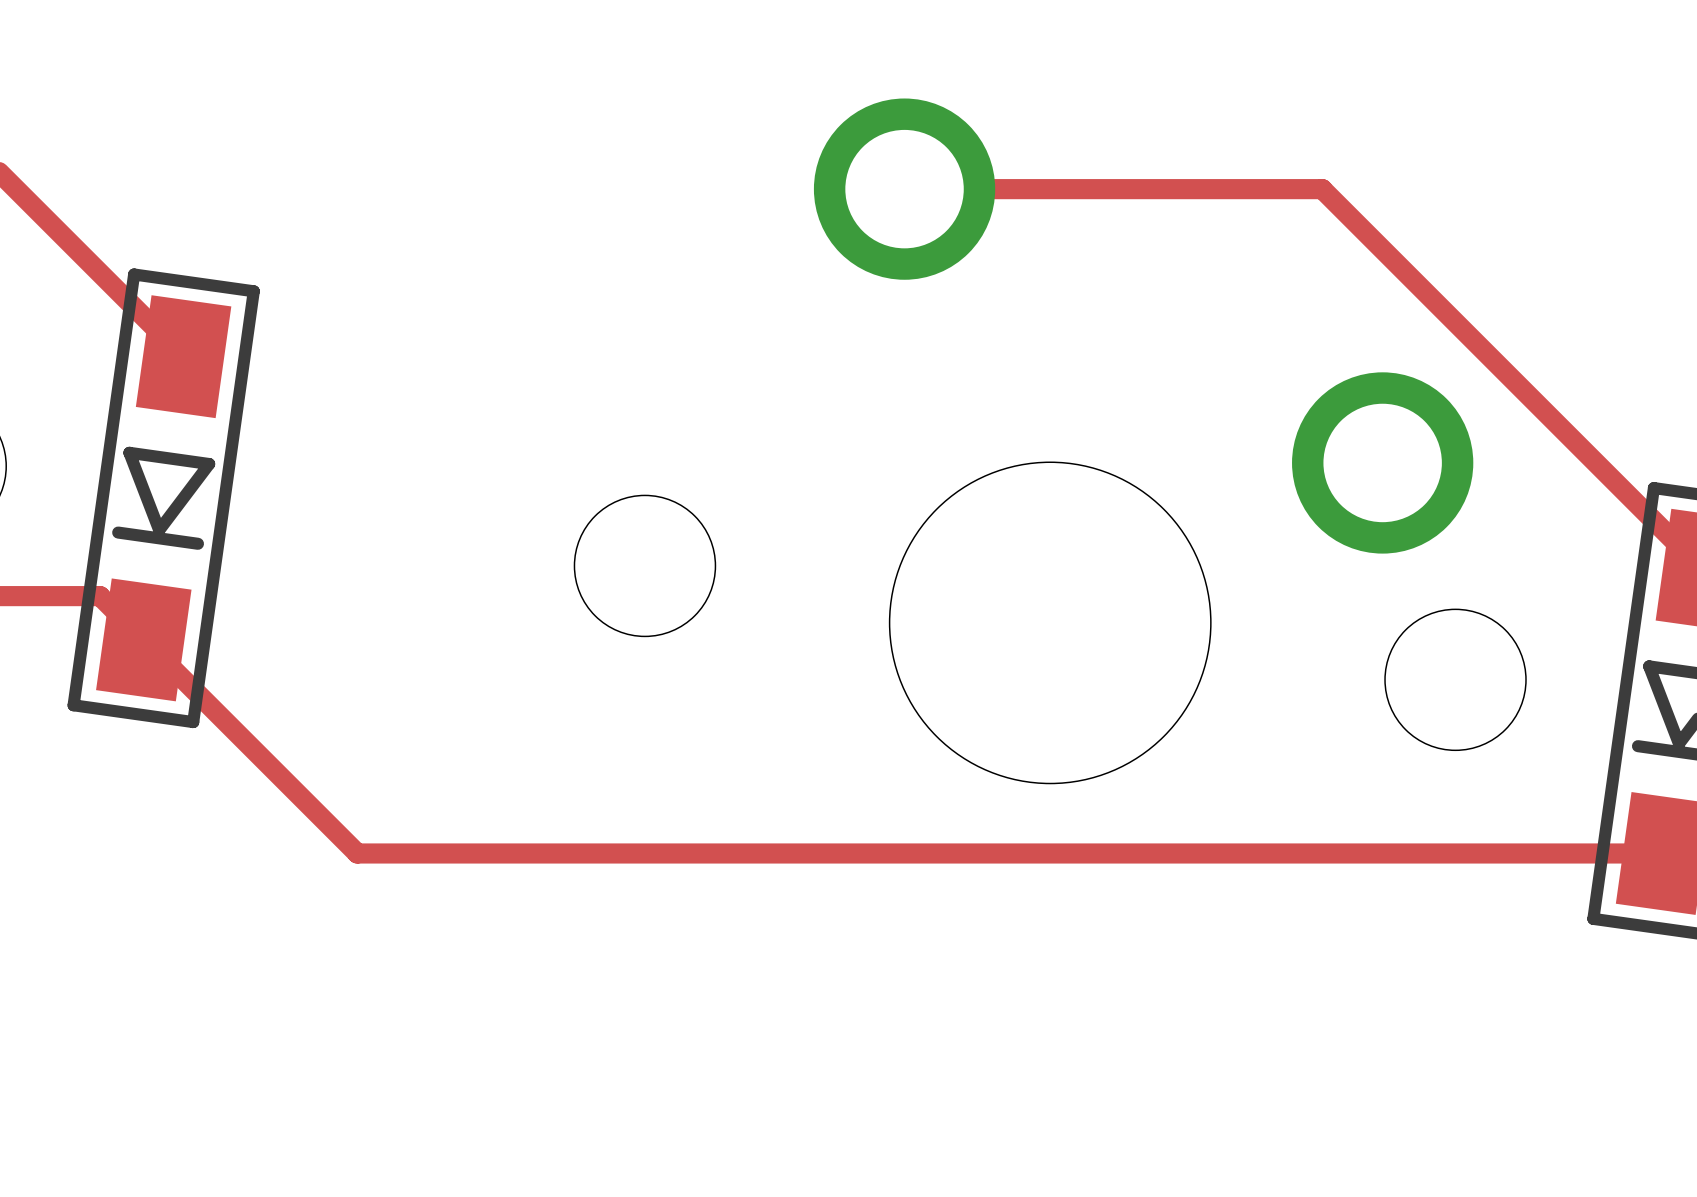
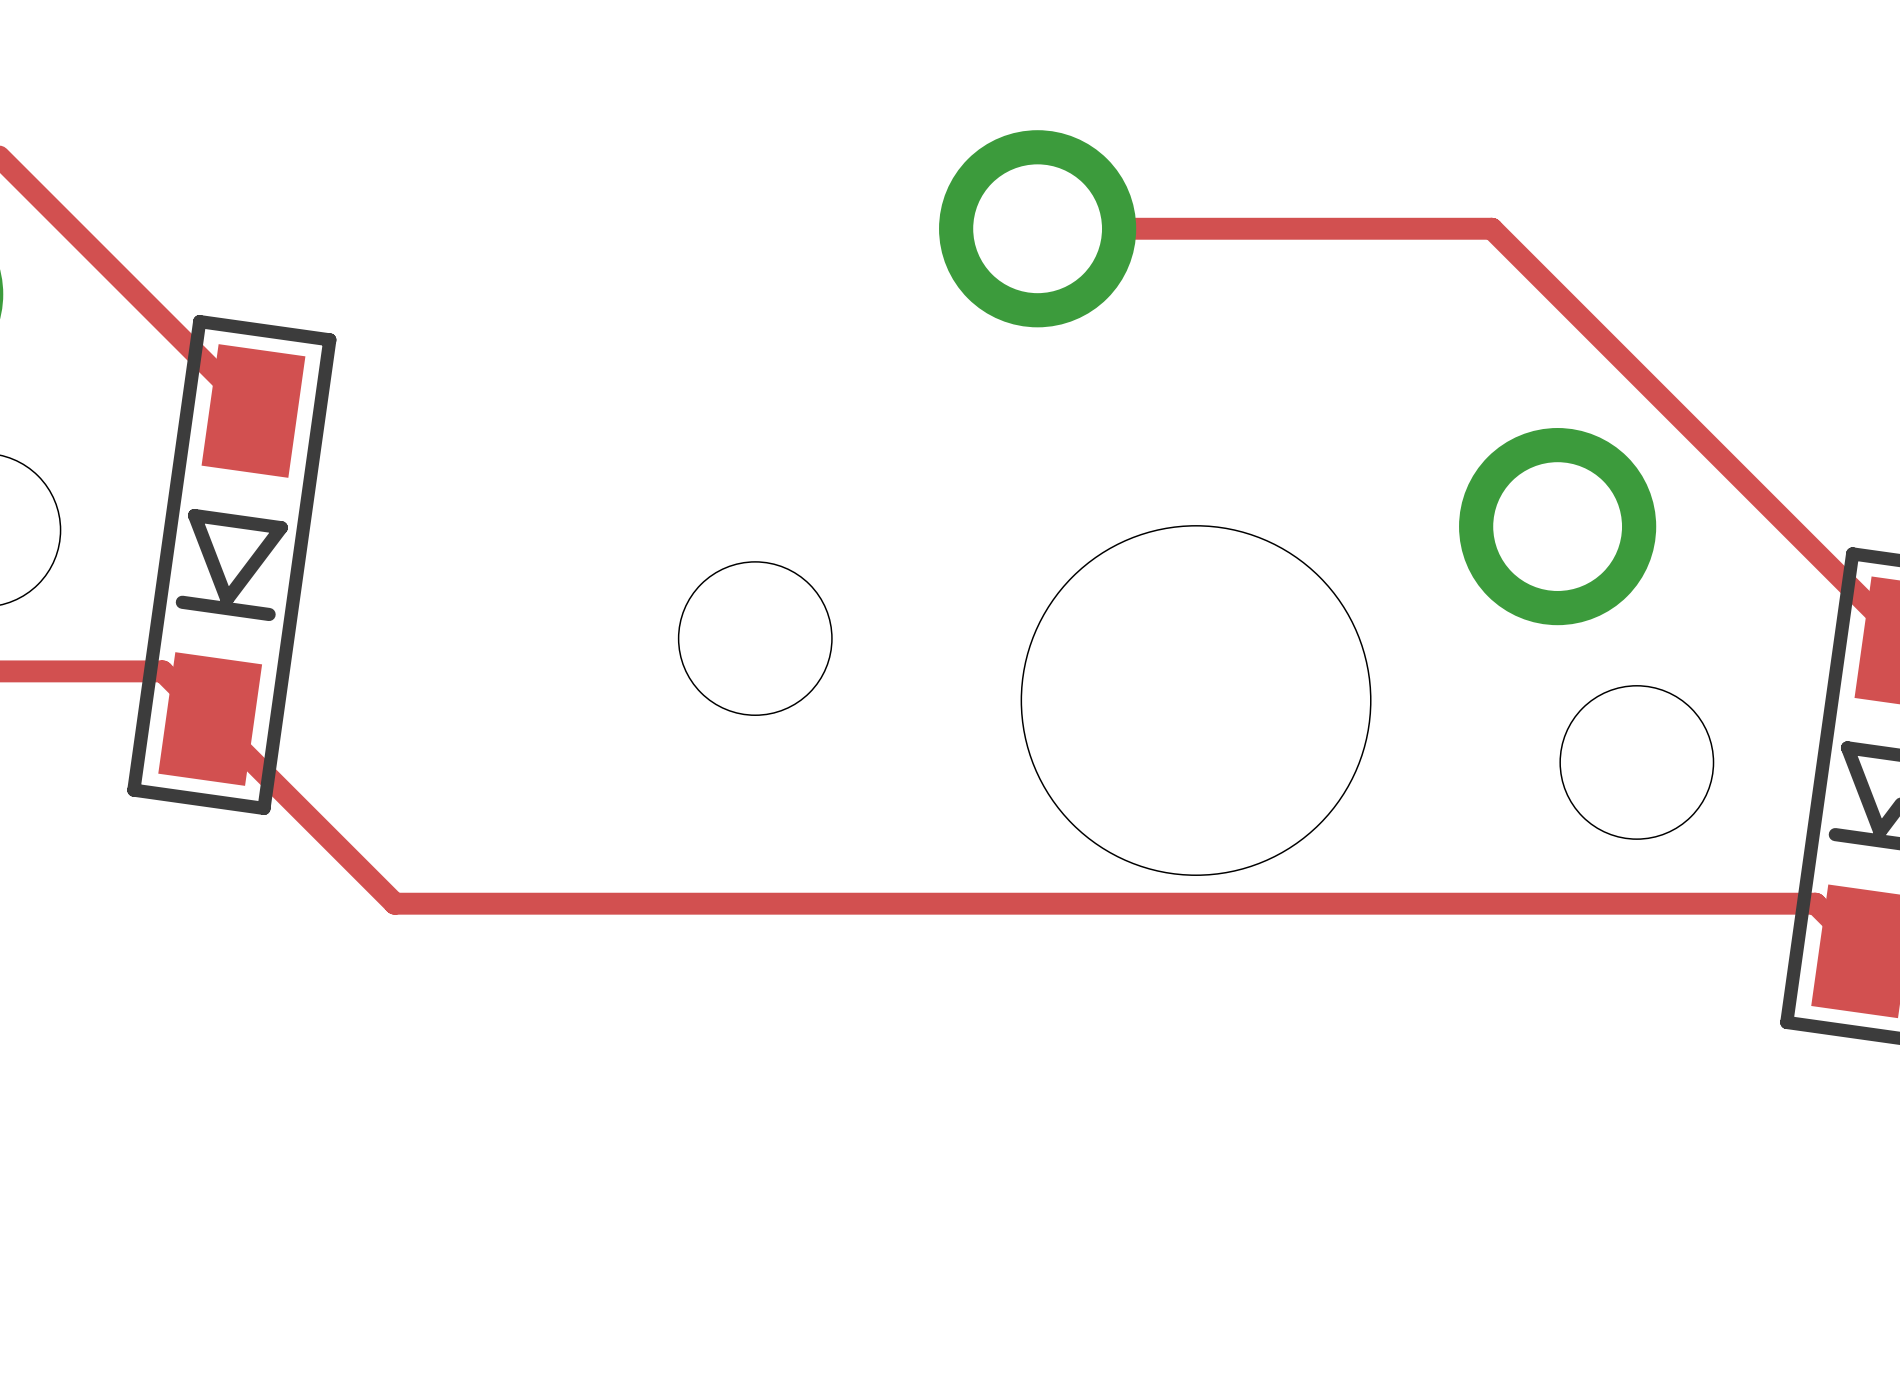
track: (313, 809) (357, 853) (1663, 853) -> (394, 903) (1815, 903) (1863, 951)

